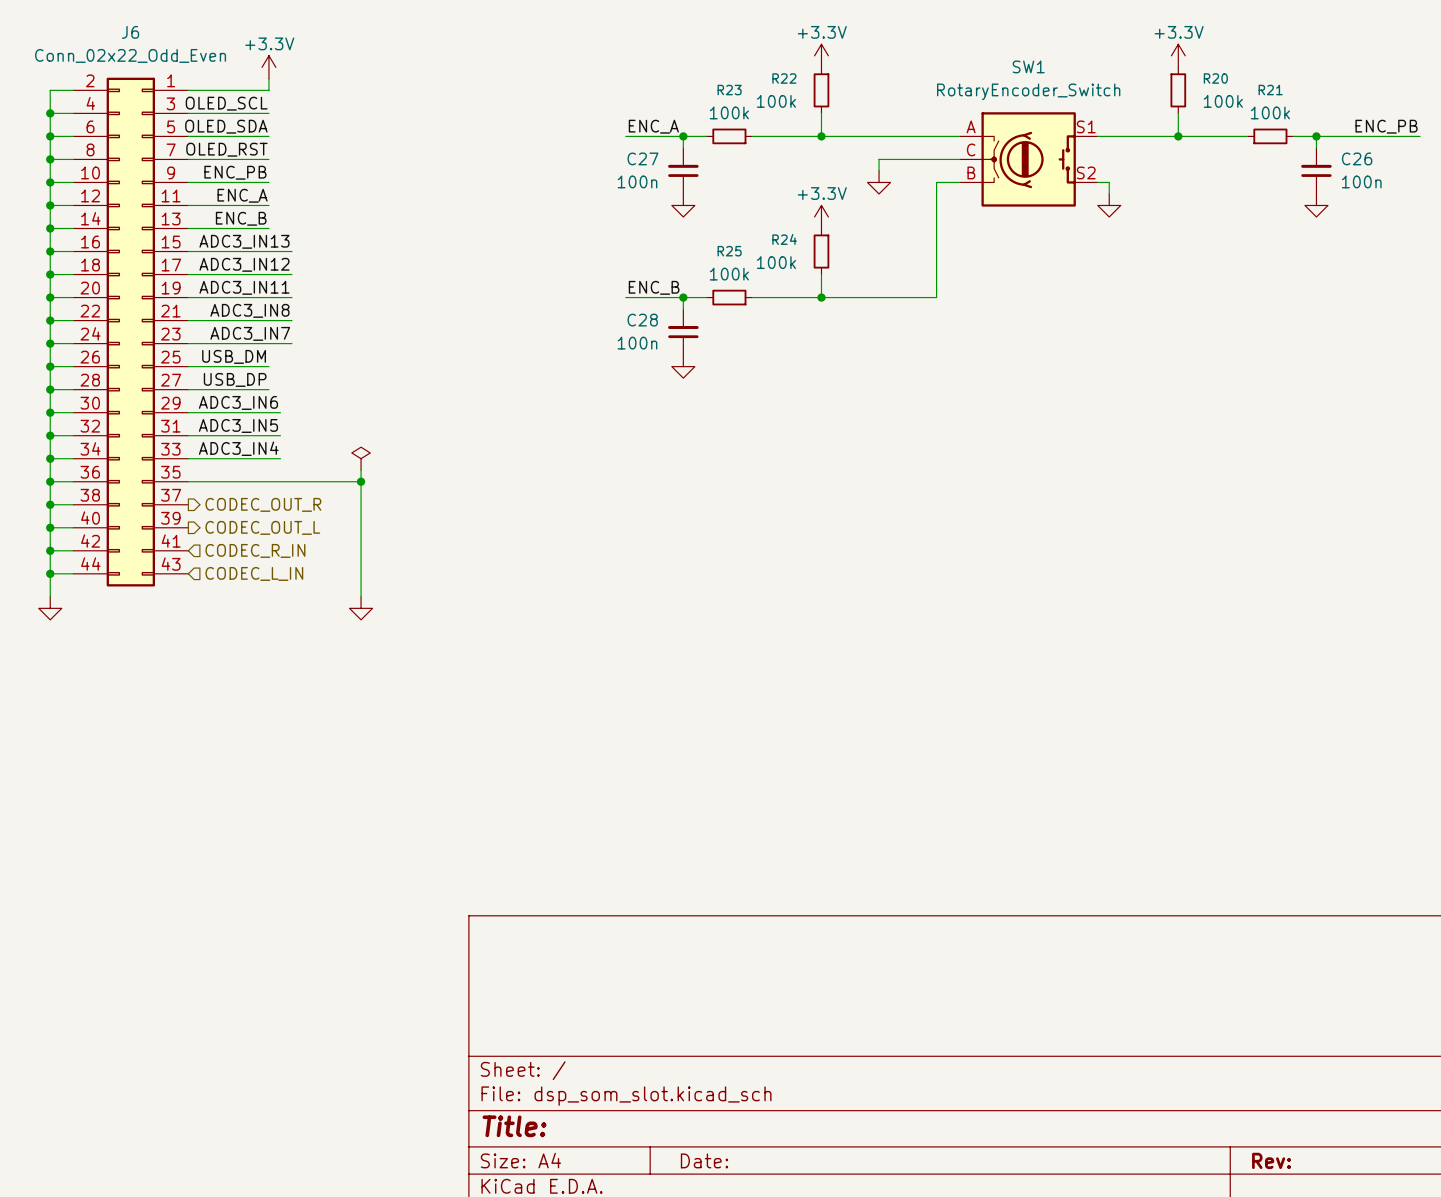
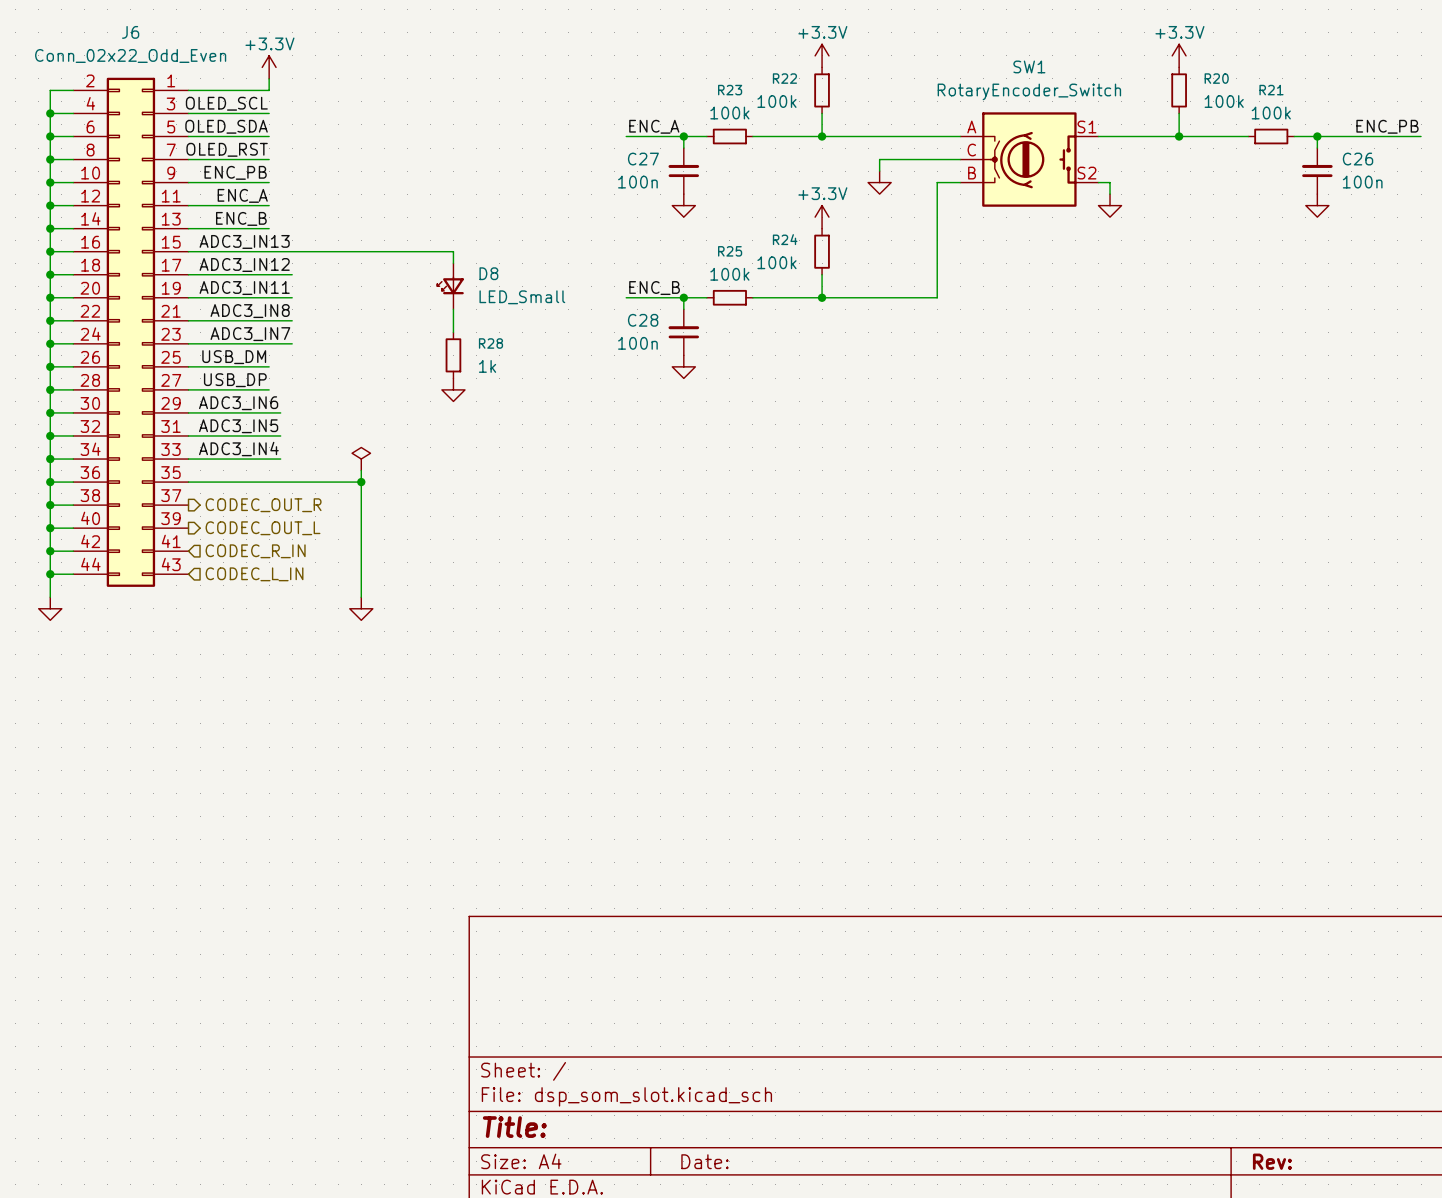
wire: none -> (292, 251) (453, 251) (453, 263)
D8: none -> LED_Small (450, 286)
wire: none -> (453, 309) (453, 332)
R28: none -> 1k (453, 355)
power symbol: none -> (453, 389)

